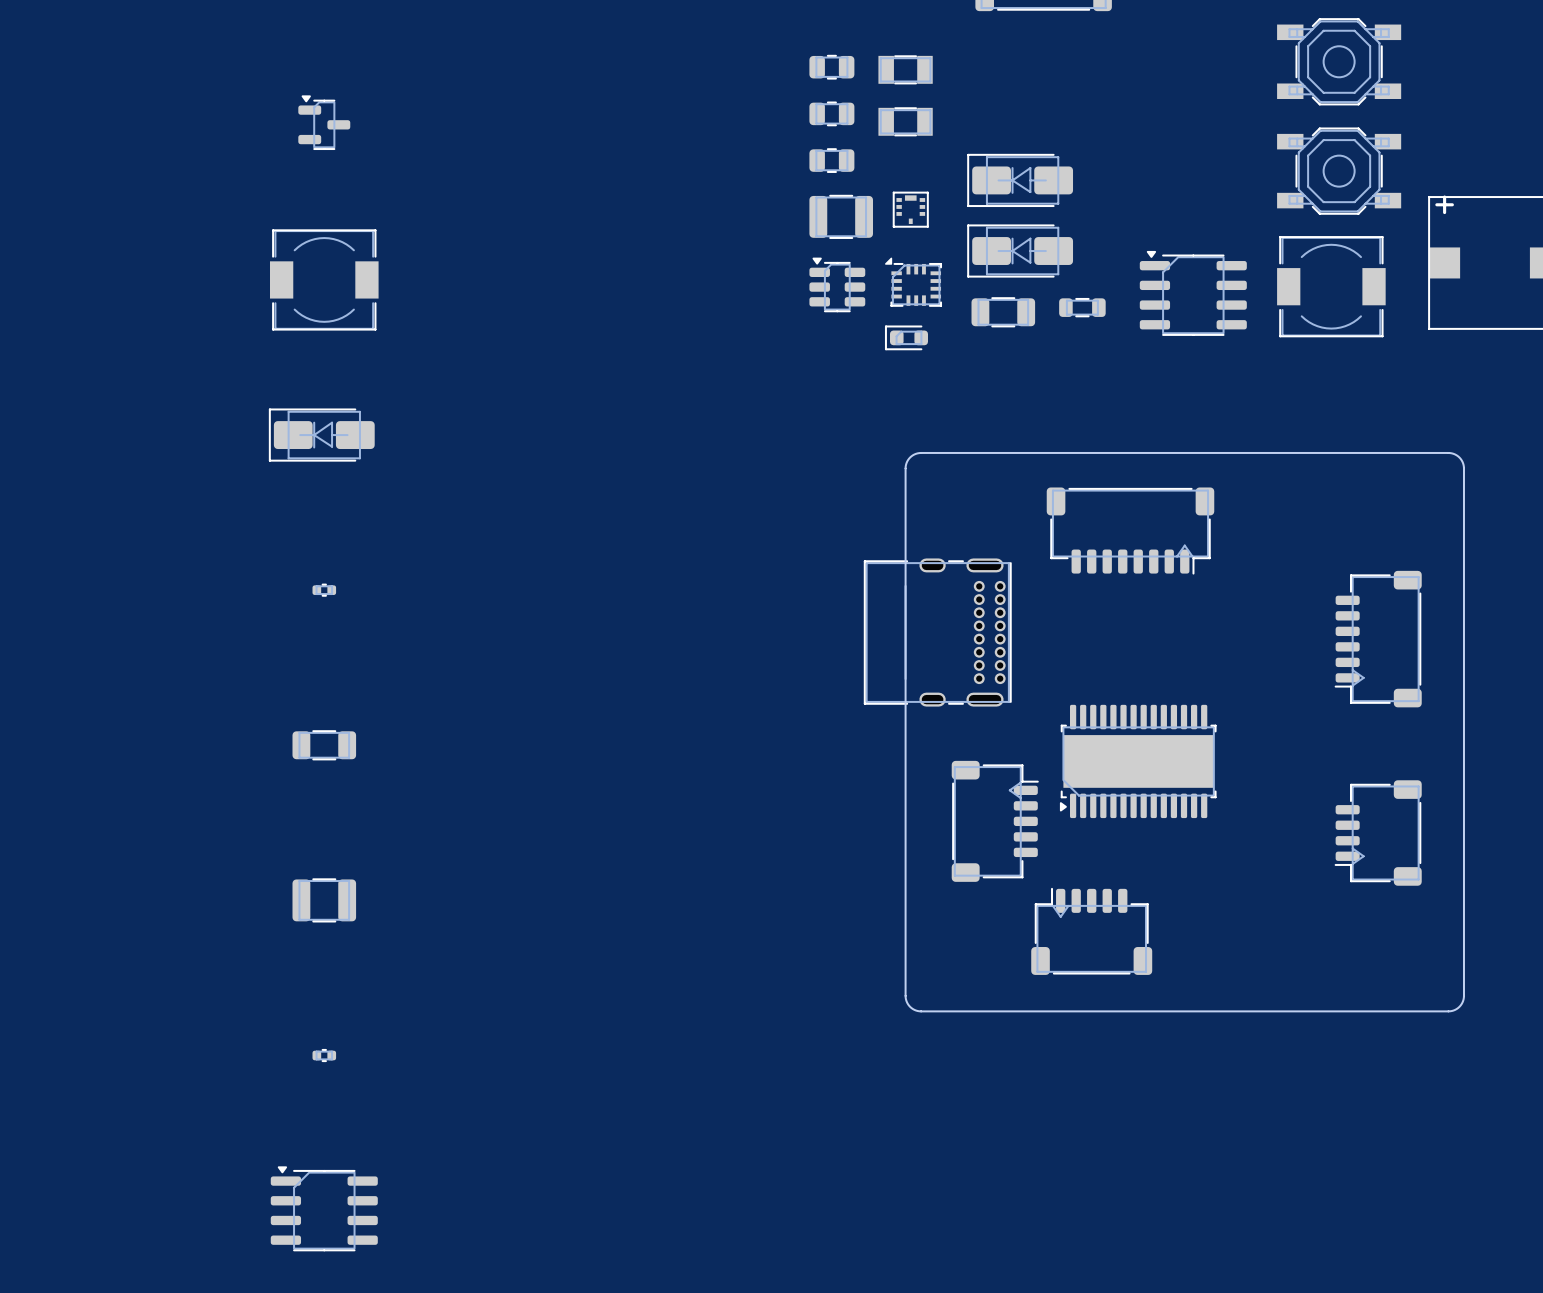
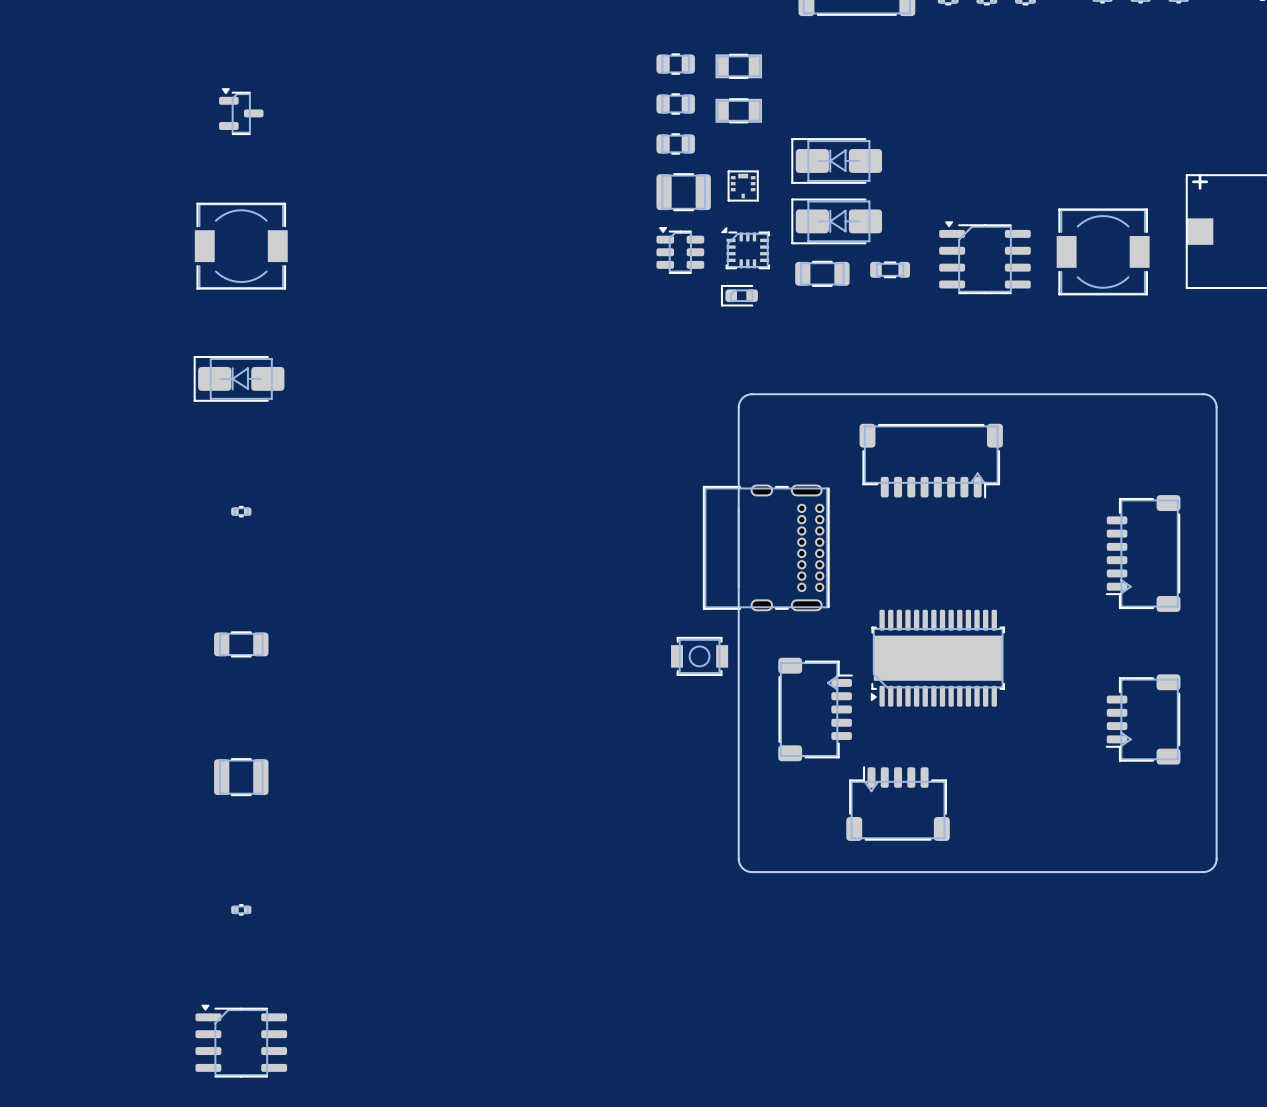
part: (1339, 61) -> none
part: (1339, 171) -> none
part: none -> (699, 656)

